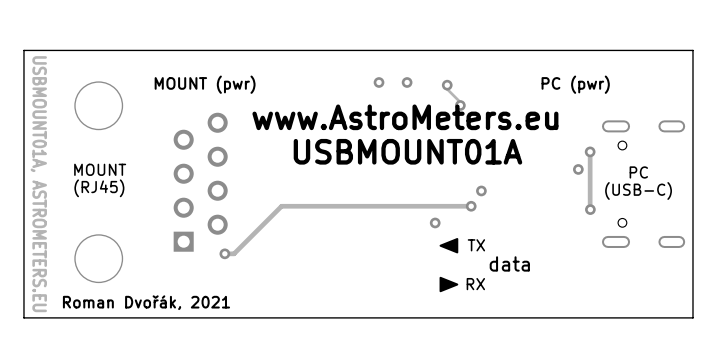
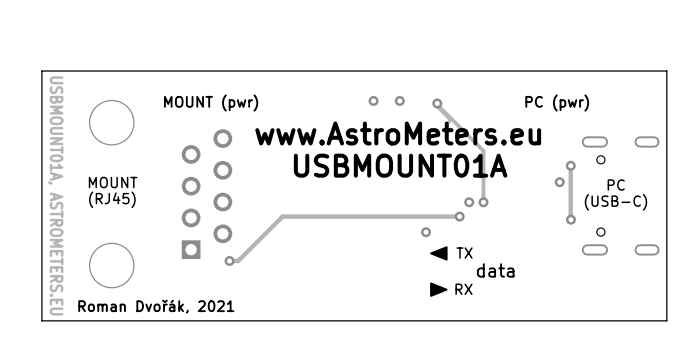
track: none -> (436, 103) (483, 150) (483, 202)
via: (460, 105) -> none
via: none -> (483, 202)

